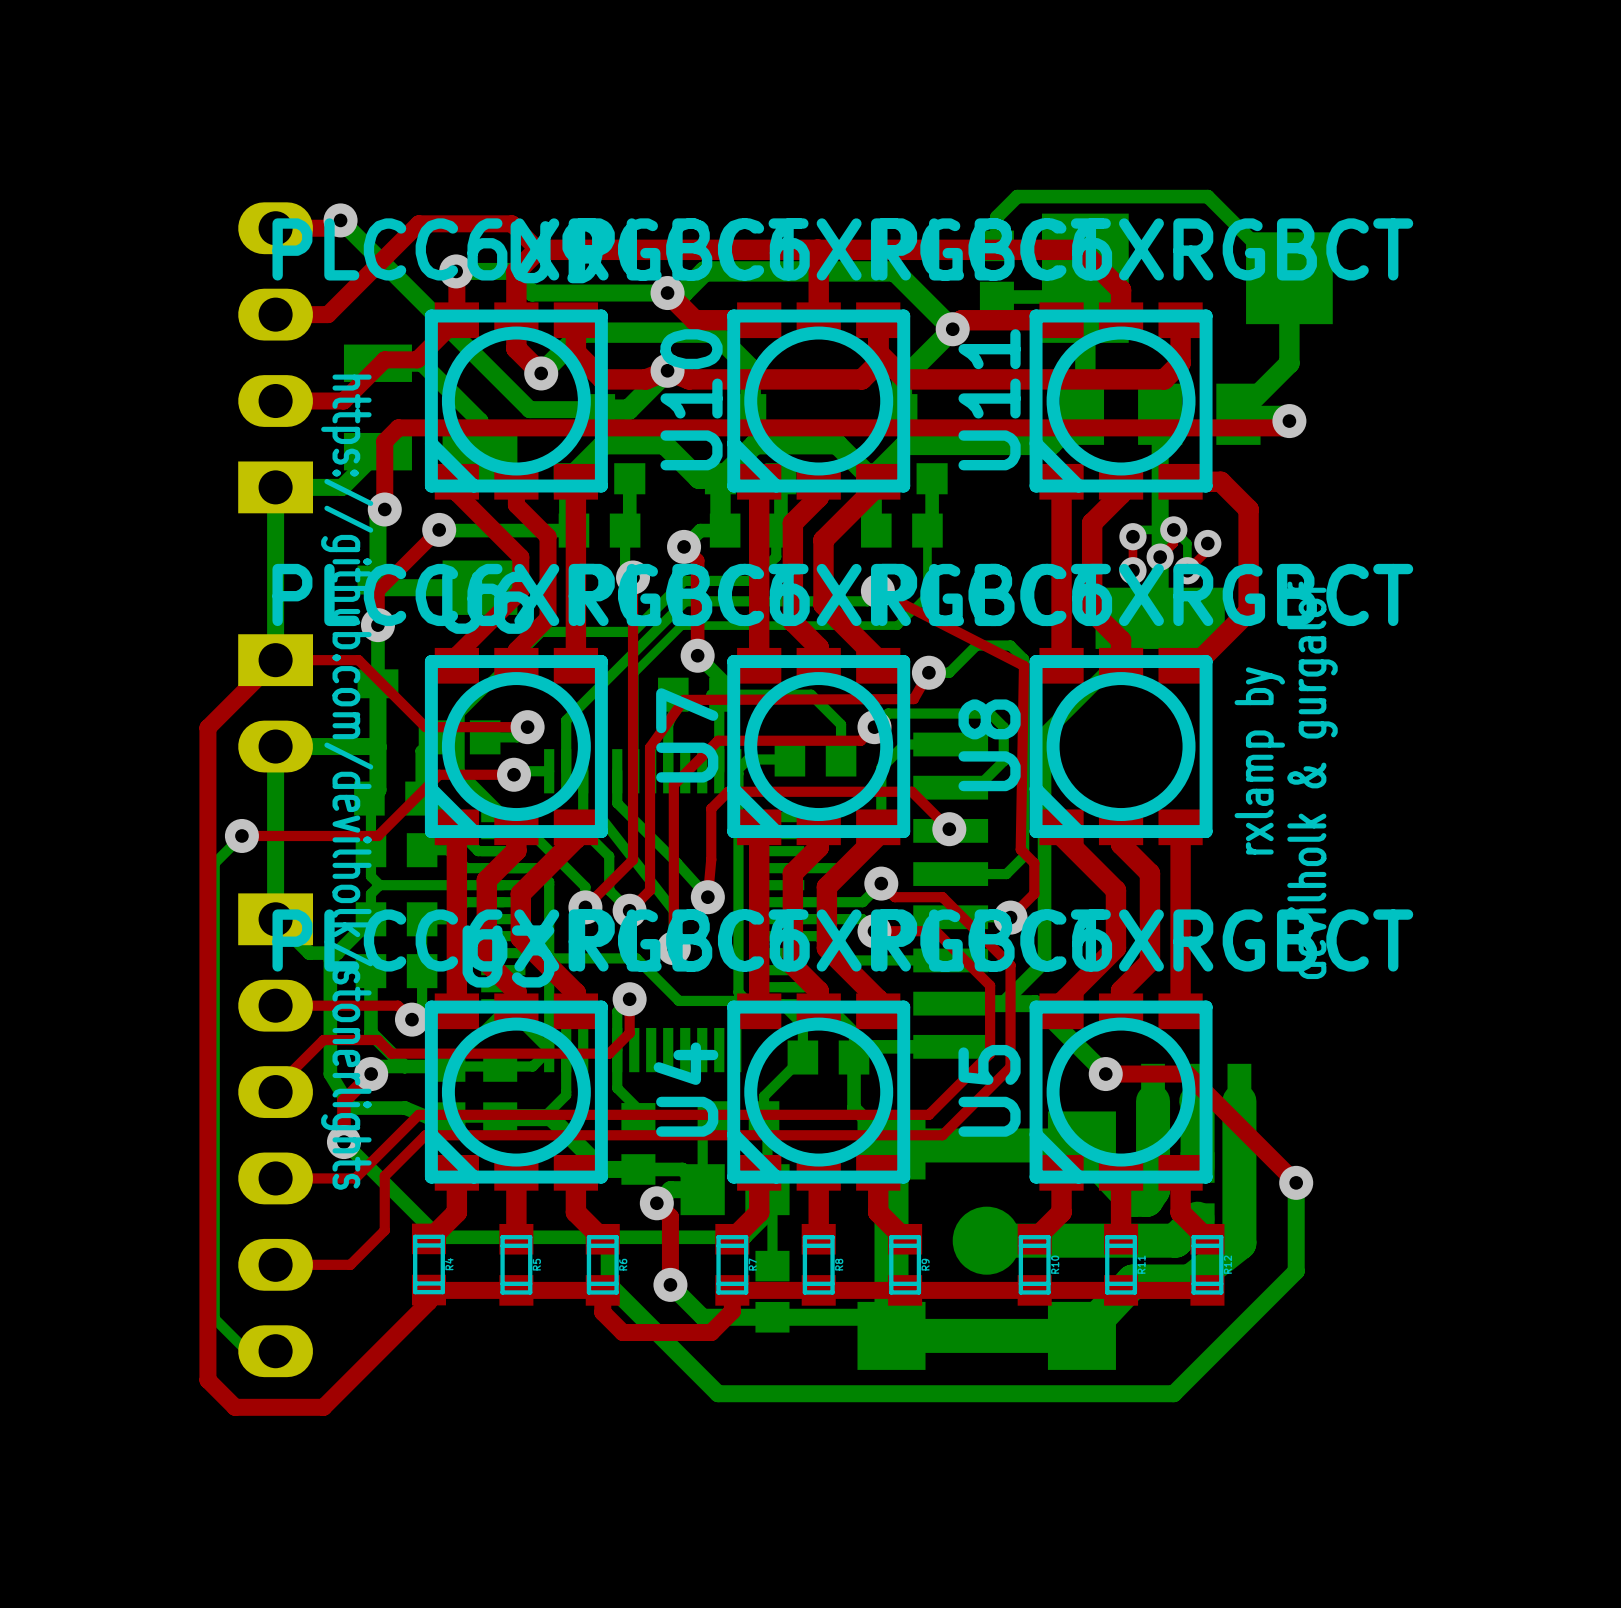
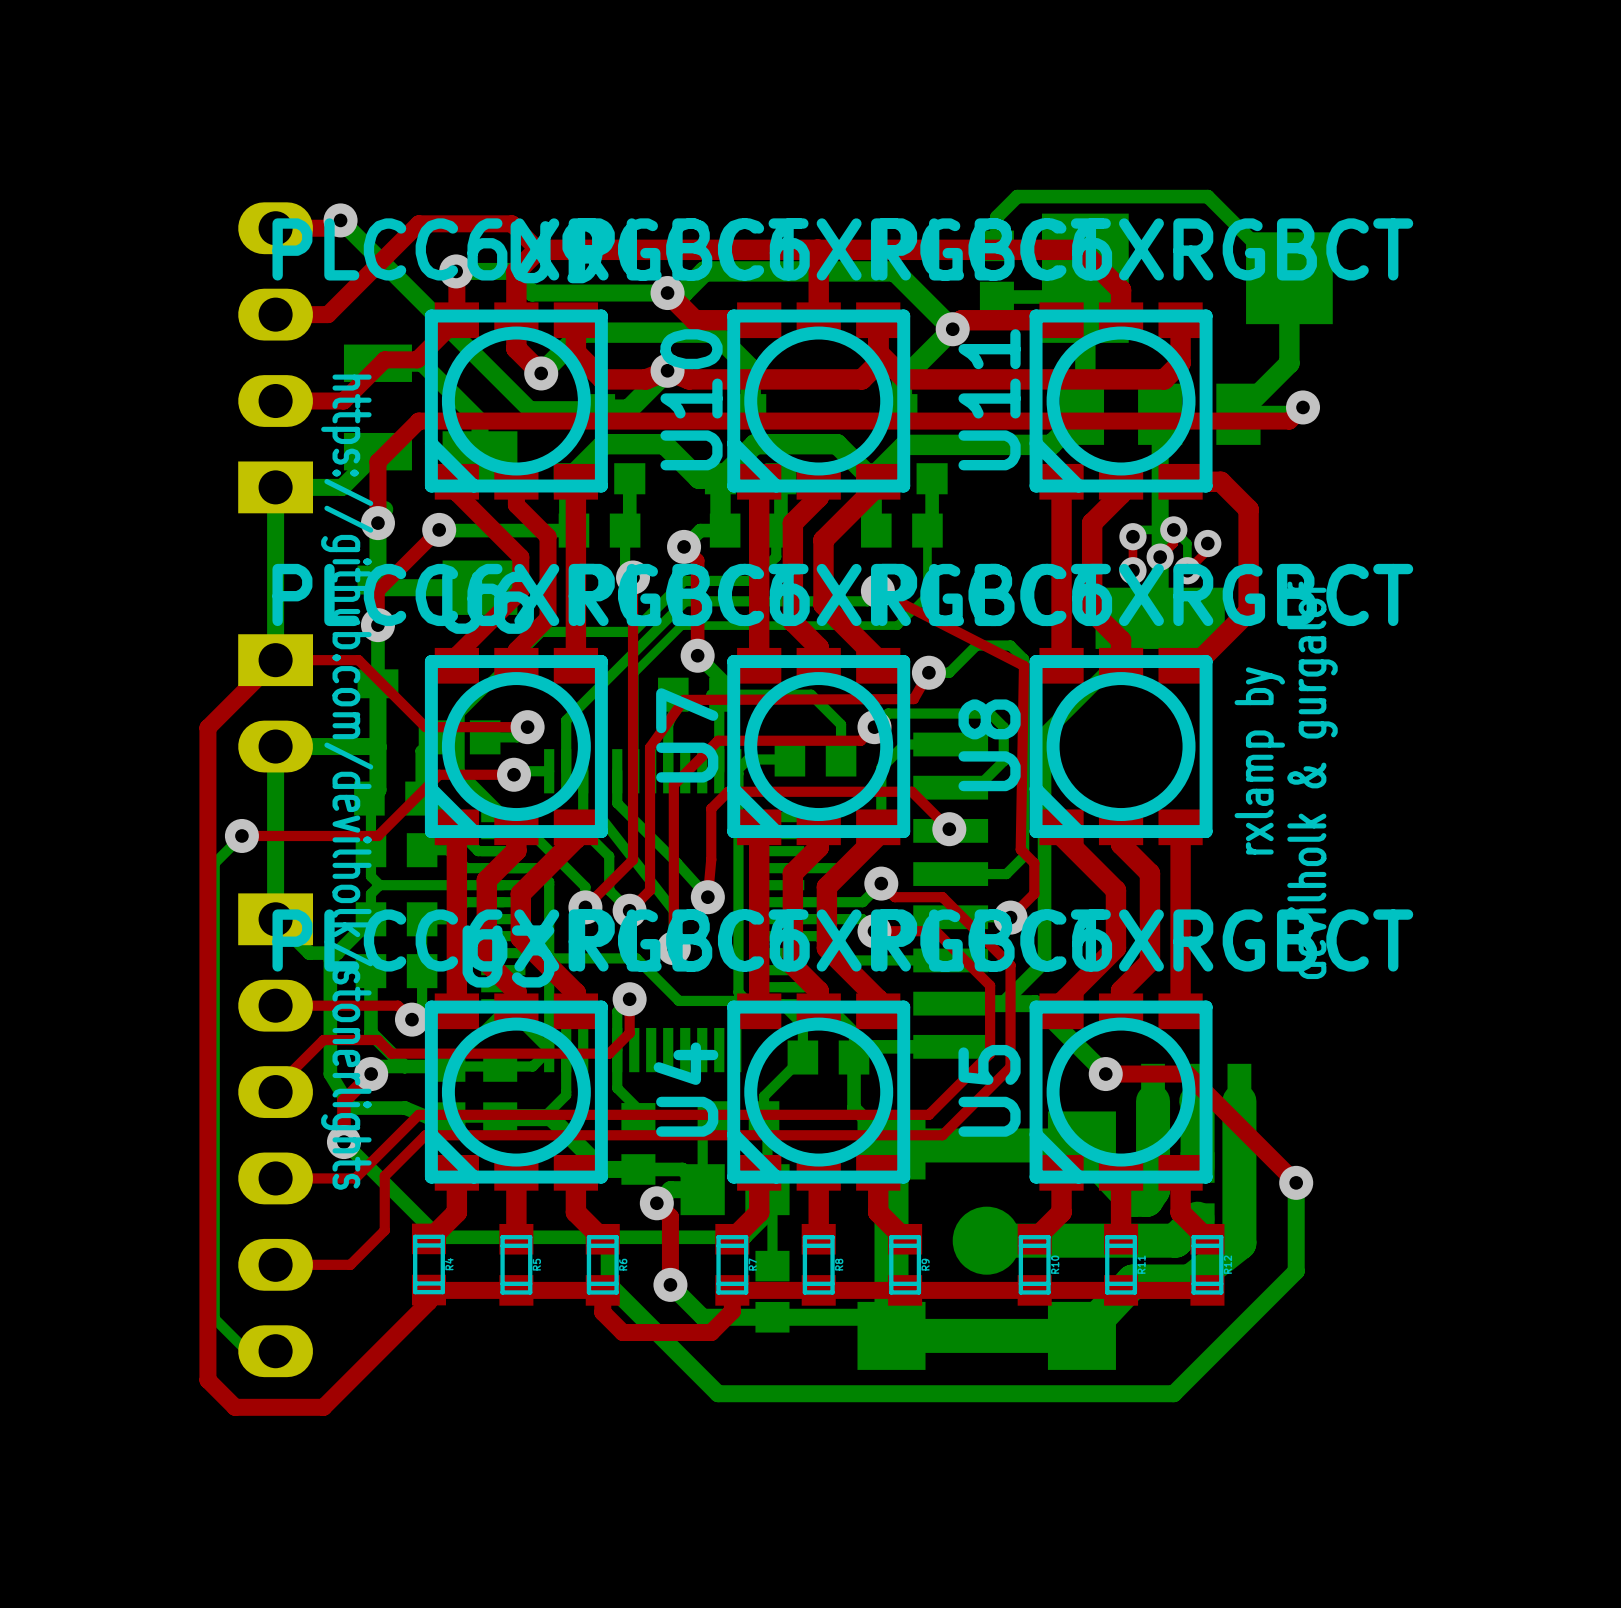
top track: none -> (1303, 407) (1289, 421) (418, 421) (377, 461) (377, 523)
top track: (1289, 421) (1282, 427) (398, 427) (384, 441) (384, 509) -> none
via position: (1289, 421) -> (1303, 407)
via position: (384, 509) -> (377, 523)

